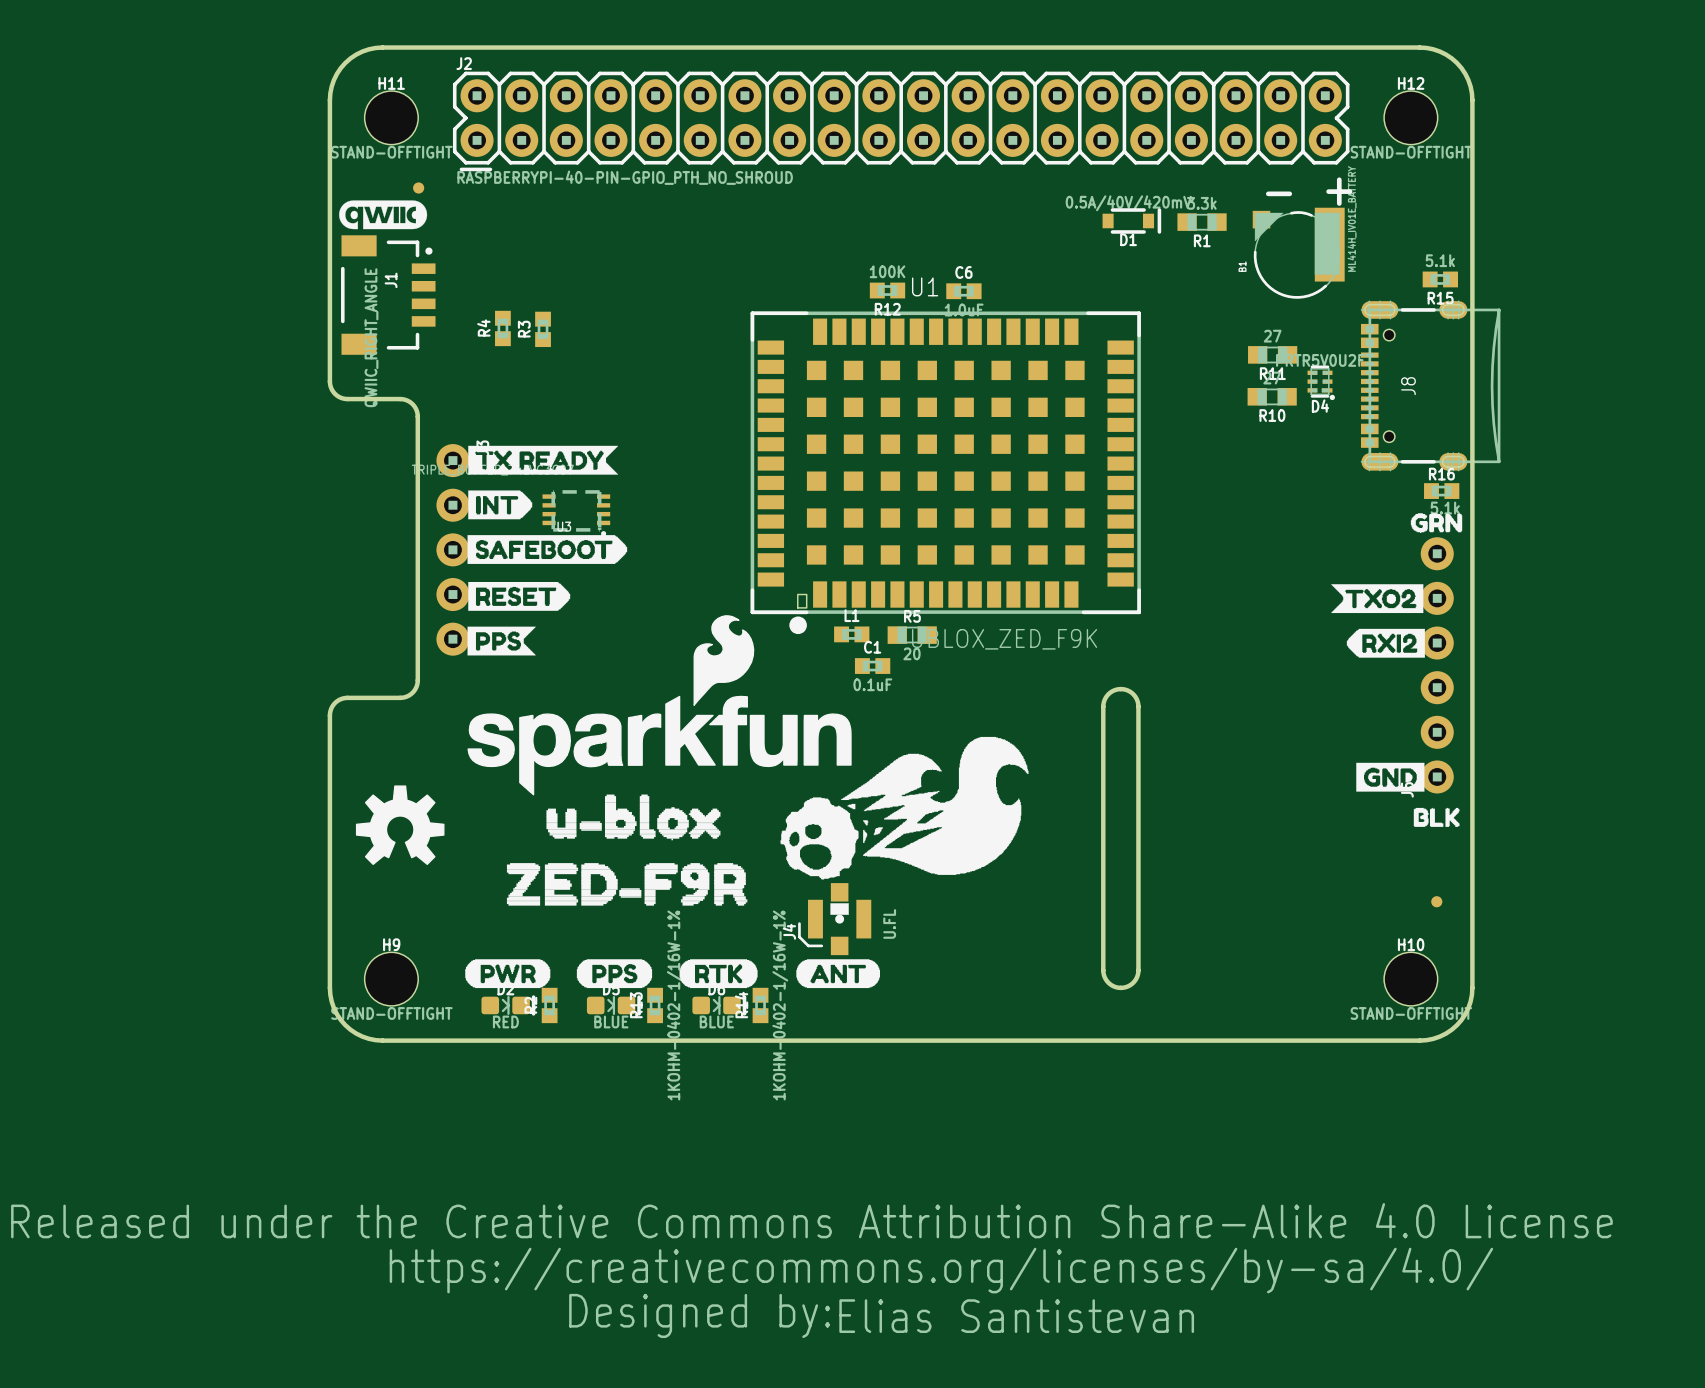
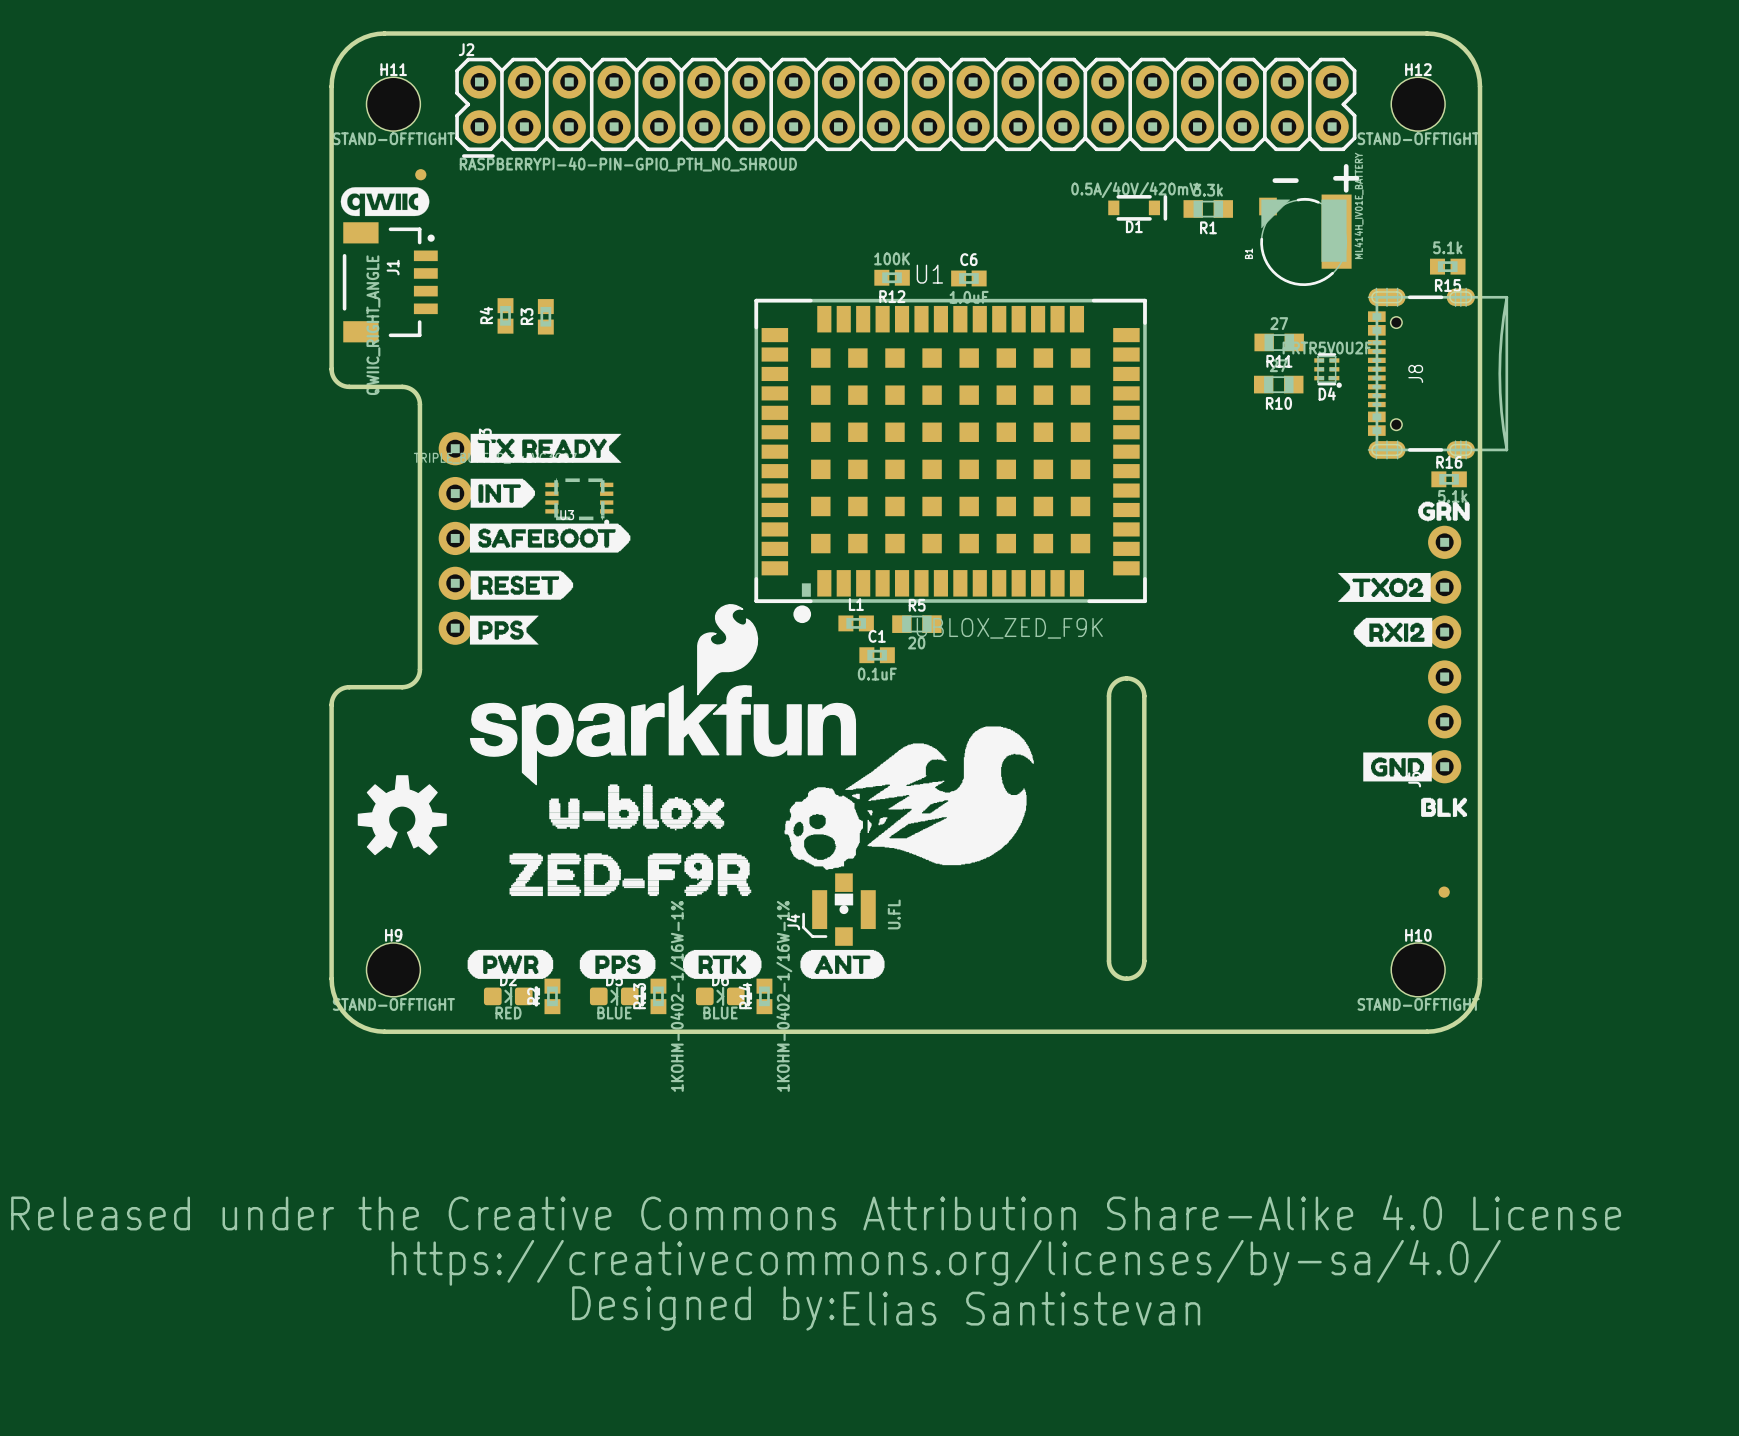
U1 footprint: [750, 311, 1141, 635] -> [754, 298, 1147, 624]

